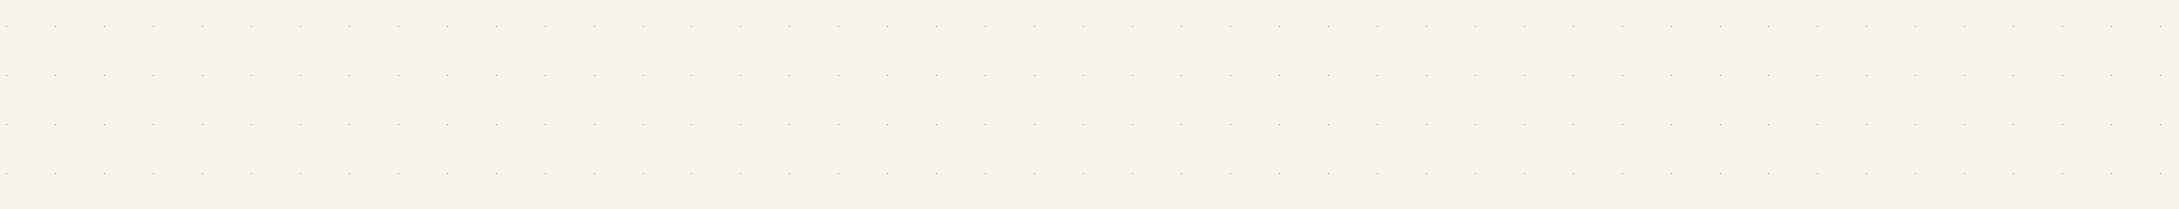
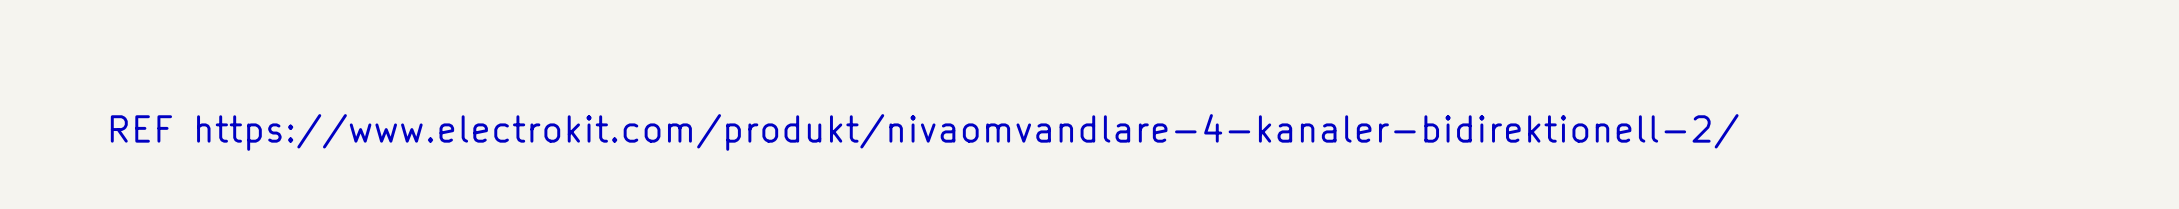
text: none -> REF https://www.electrokit.com/produkt/nivaomvandlare-4-kanaler-bidirektionell-2/ (924, 132)

